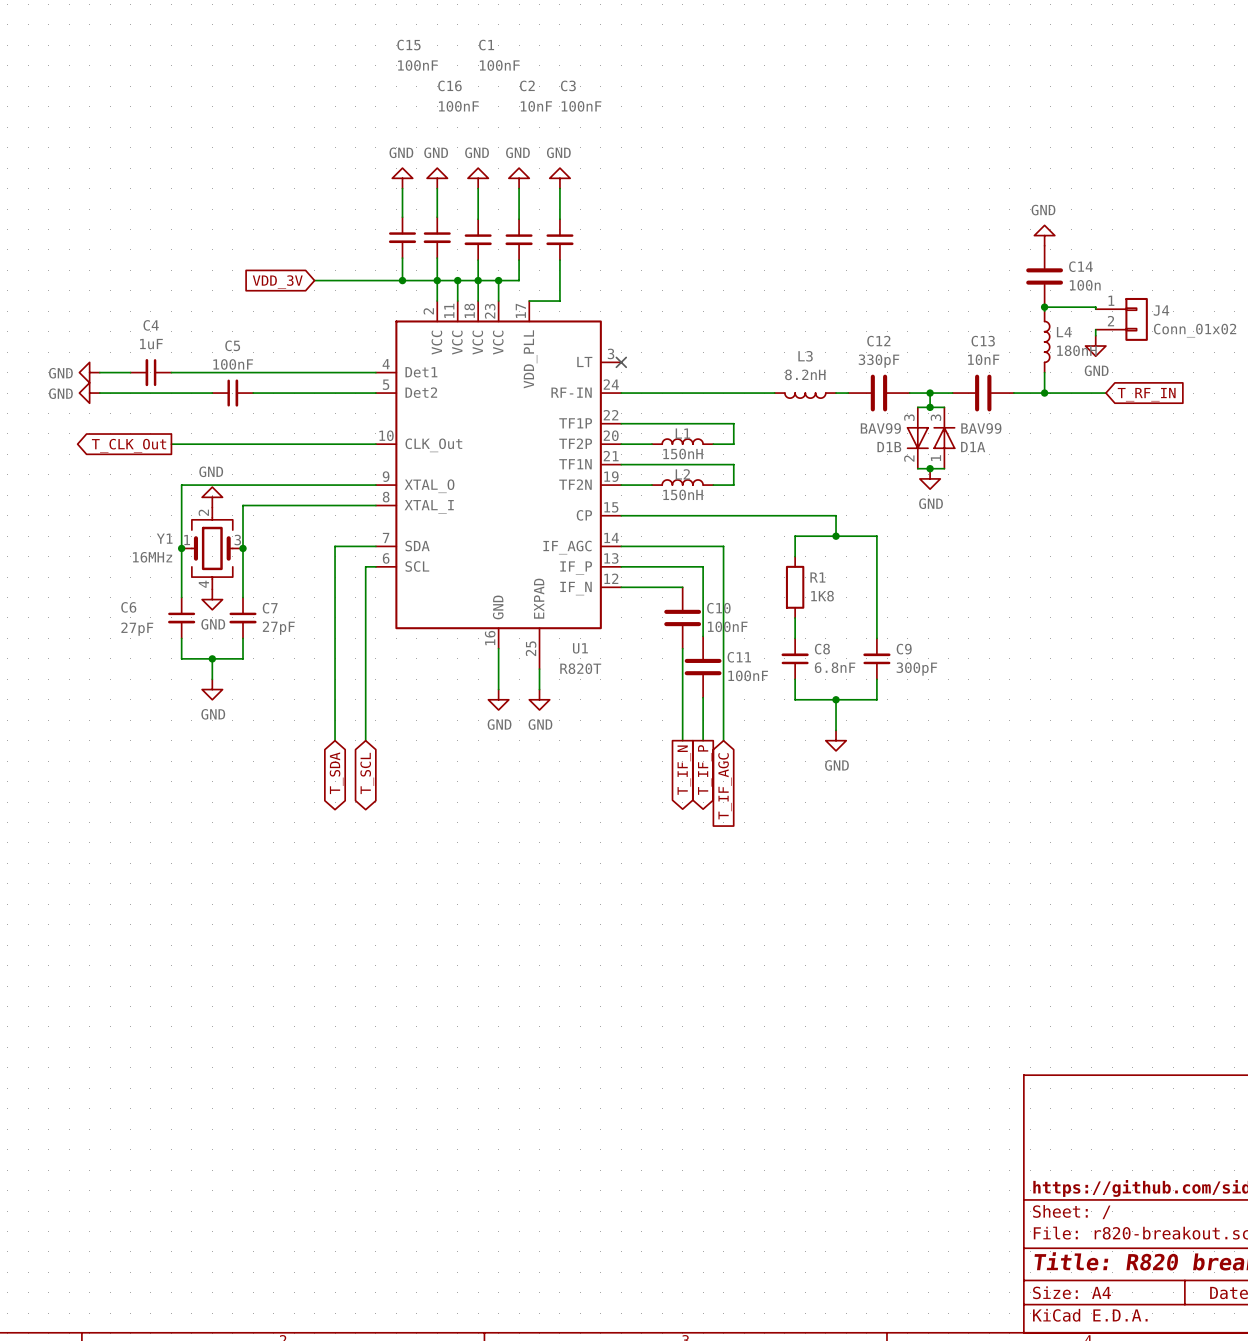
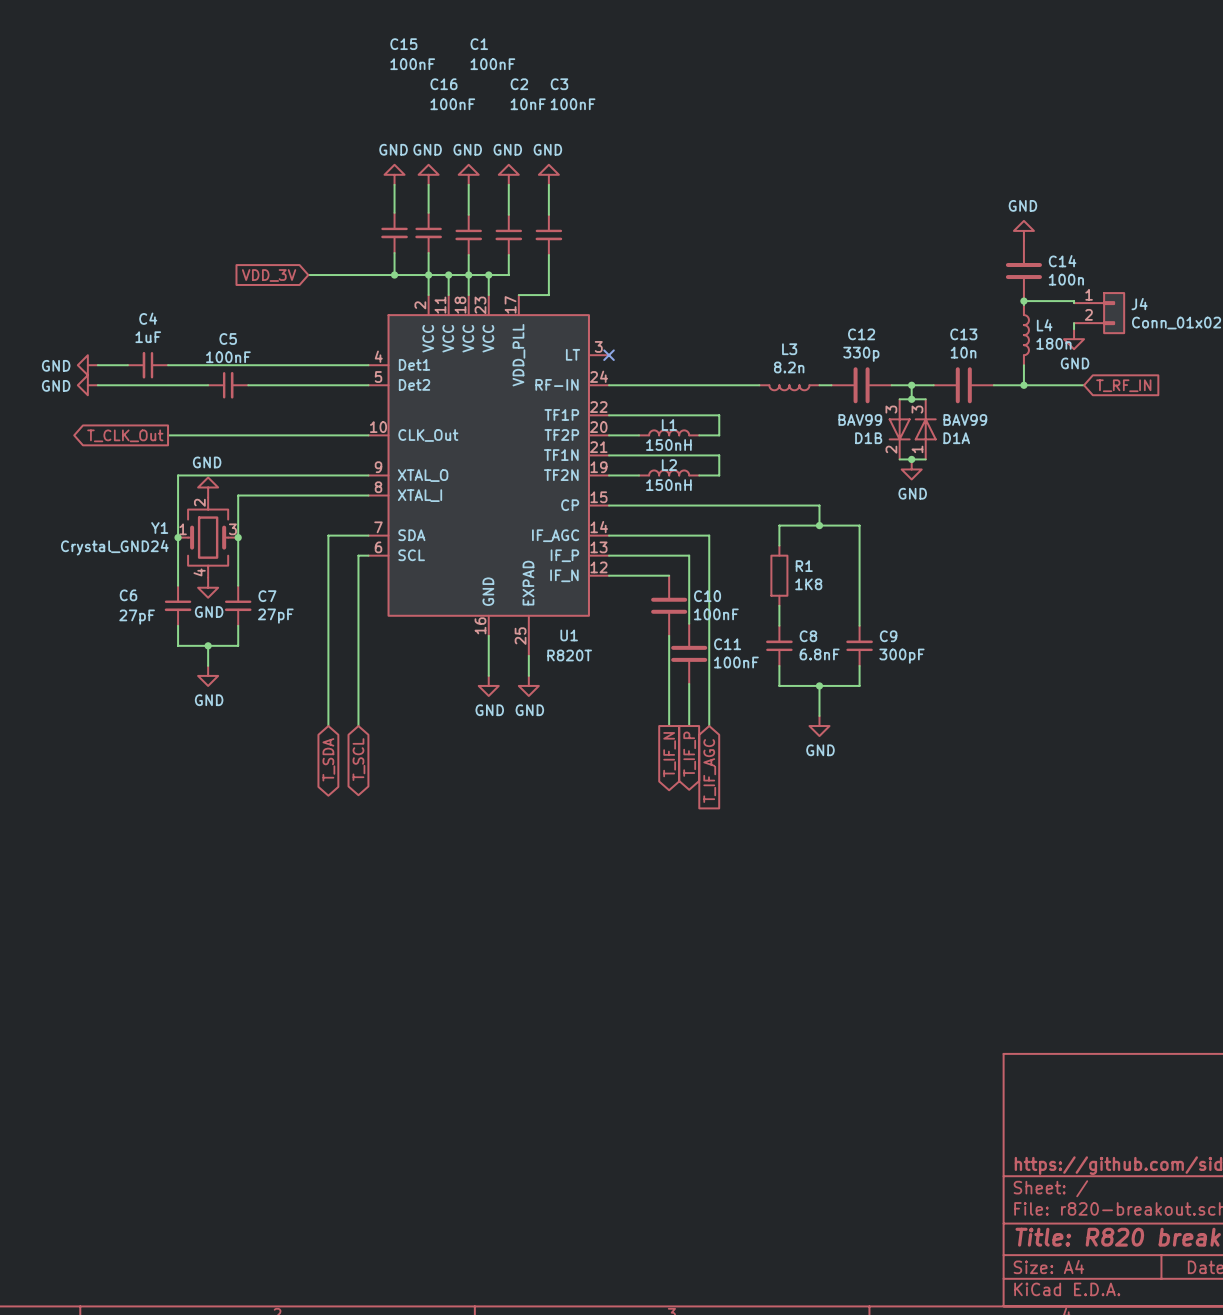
L4 value: 180nH (1076, 350) -> 180n (1053, 343)
C13 value: 10nF (983, 359) -> 10n (963, 352)
C12 value: 330pF (879, 361) -> 330p (861, 354)
L3 value: 8.2nH (805, 374) -> 8.2n (789, 367)
Y1 value: 16MHz (152, 557) -> Crystal_GND24 (114, 547)

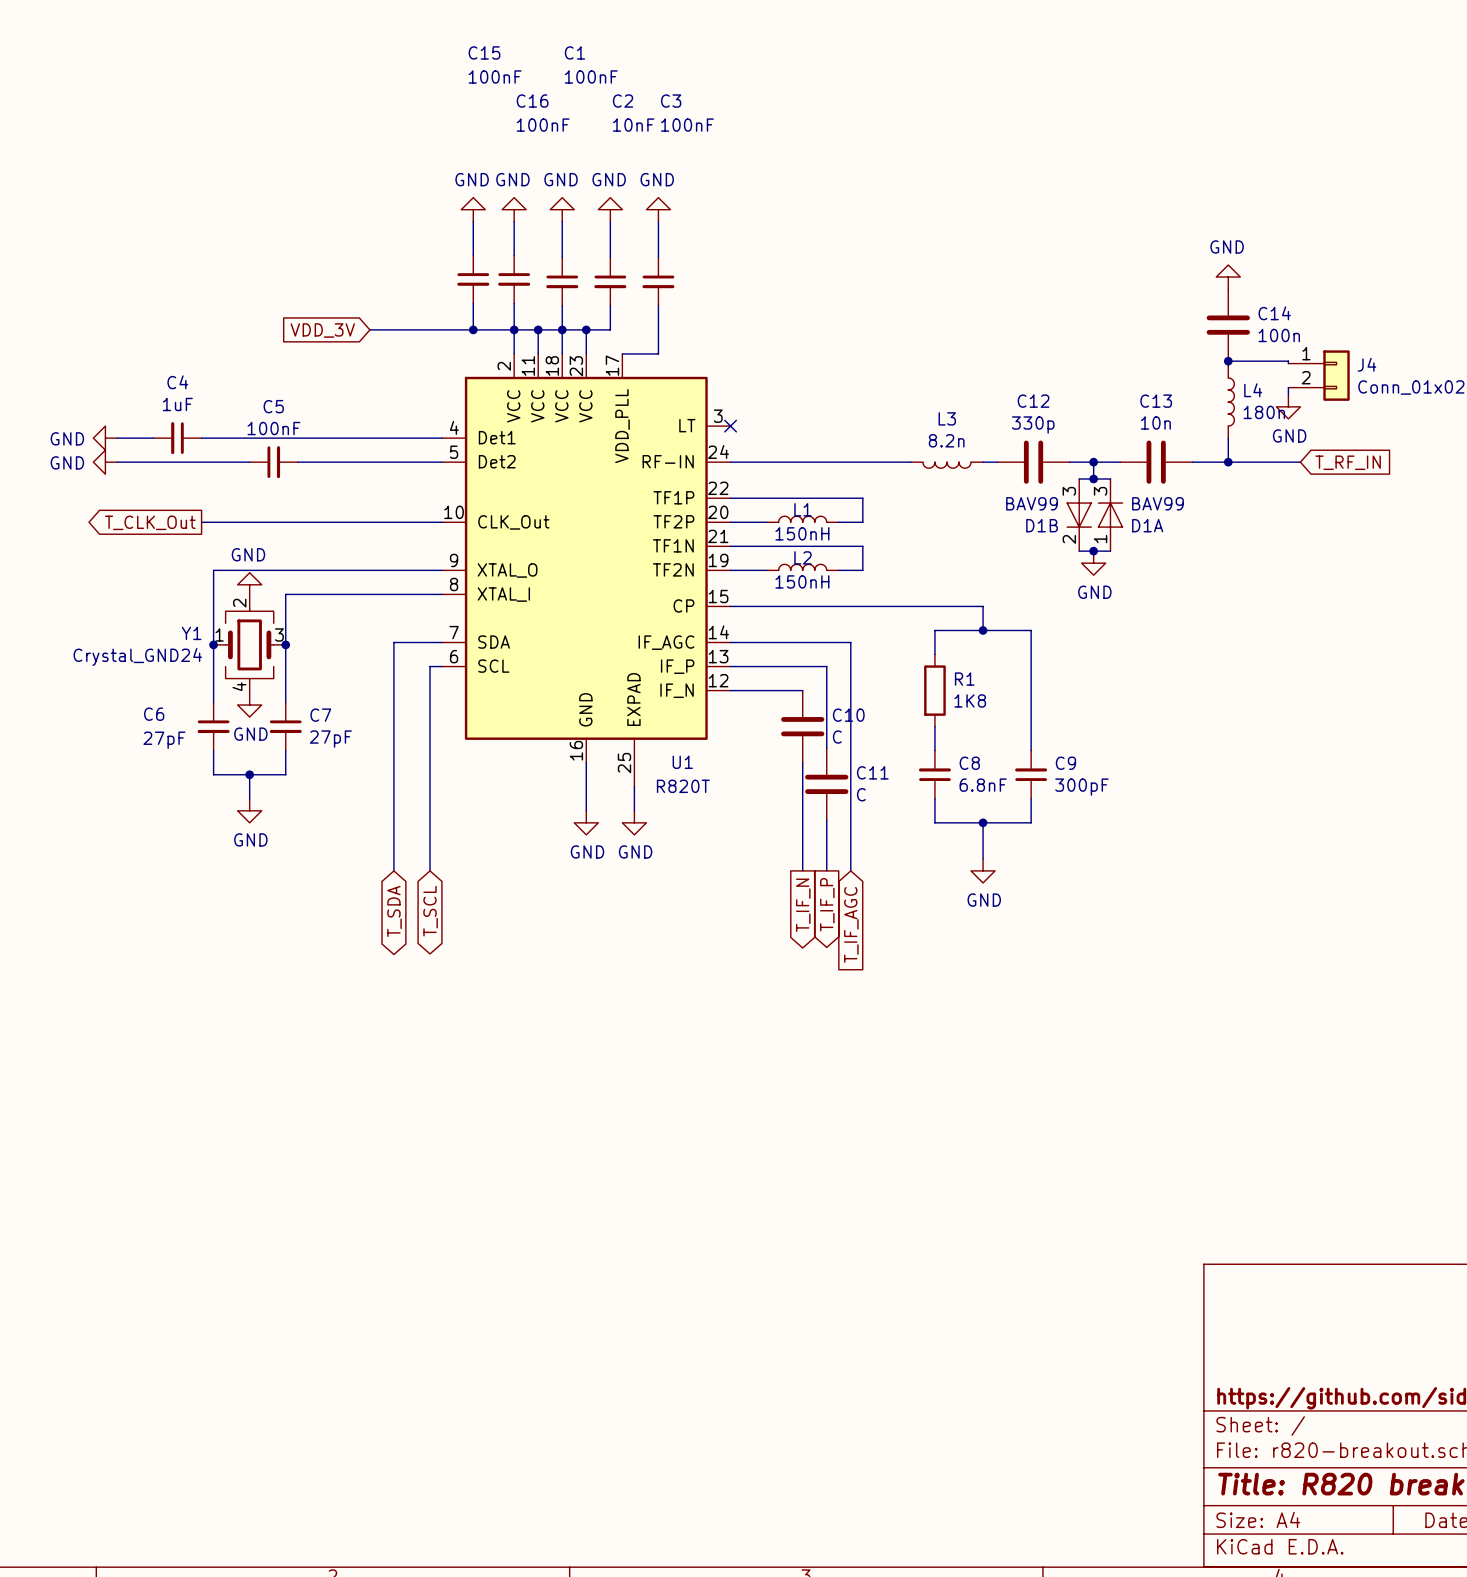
C10 value: 100nF (716, 614) -> C (837, 737)
C11 value: 100nF (736, 662) -> C (861, 794)

